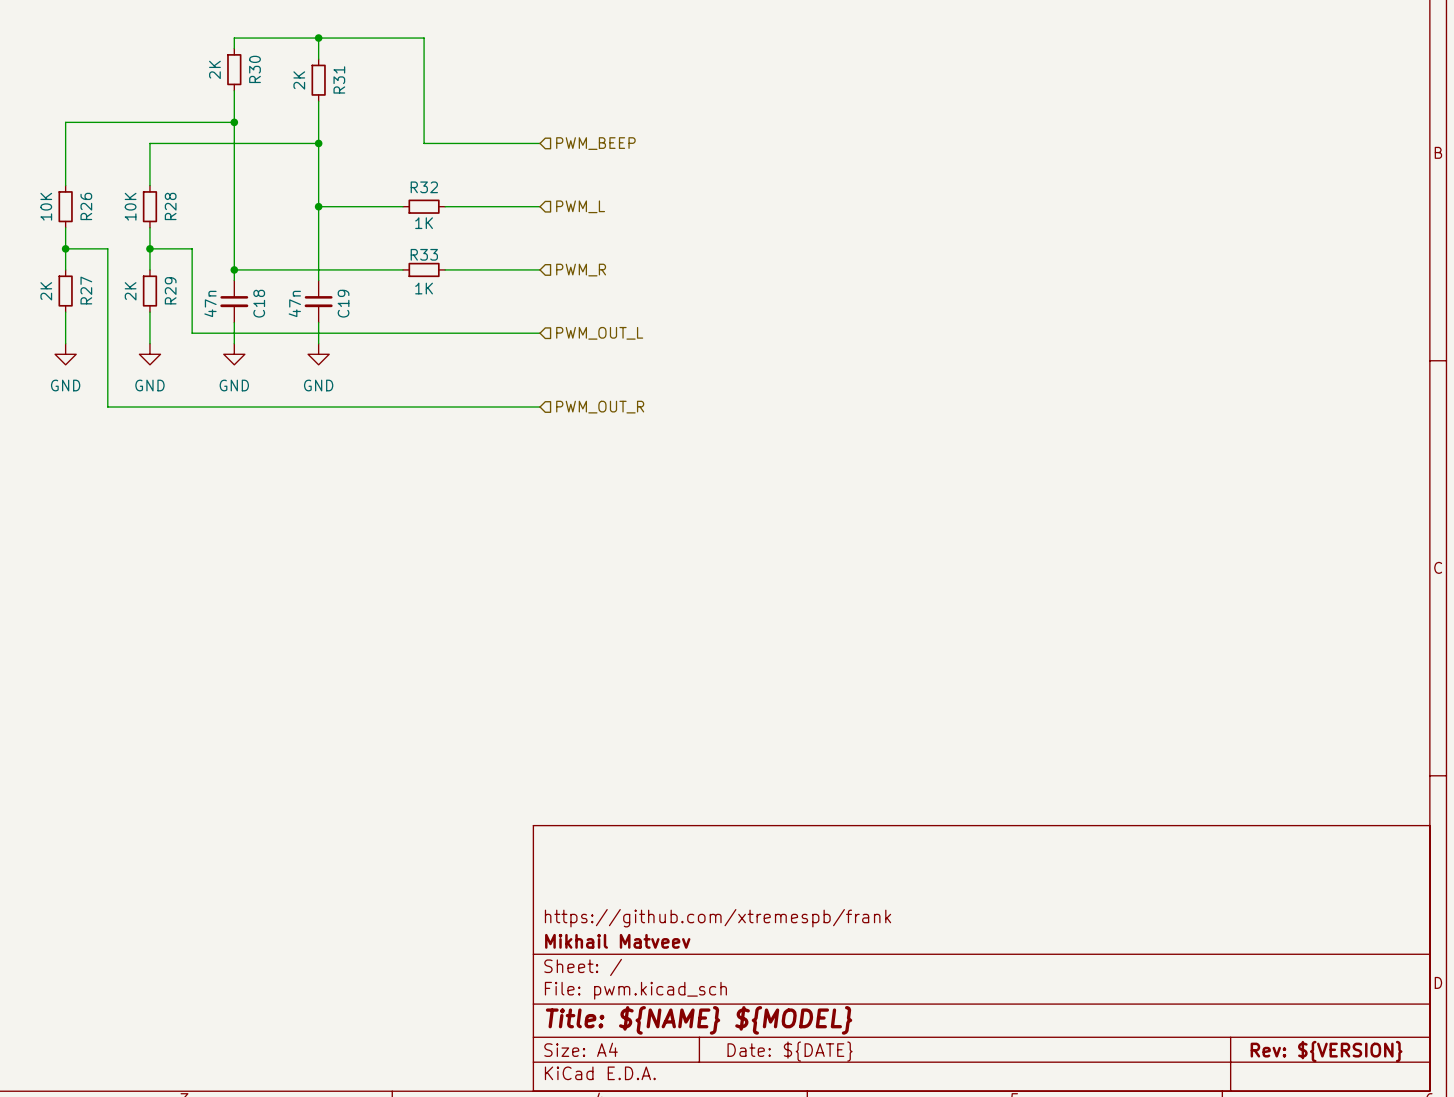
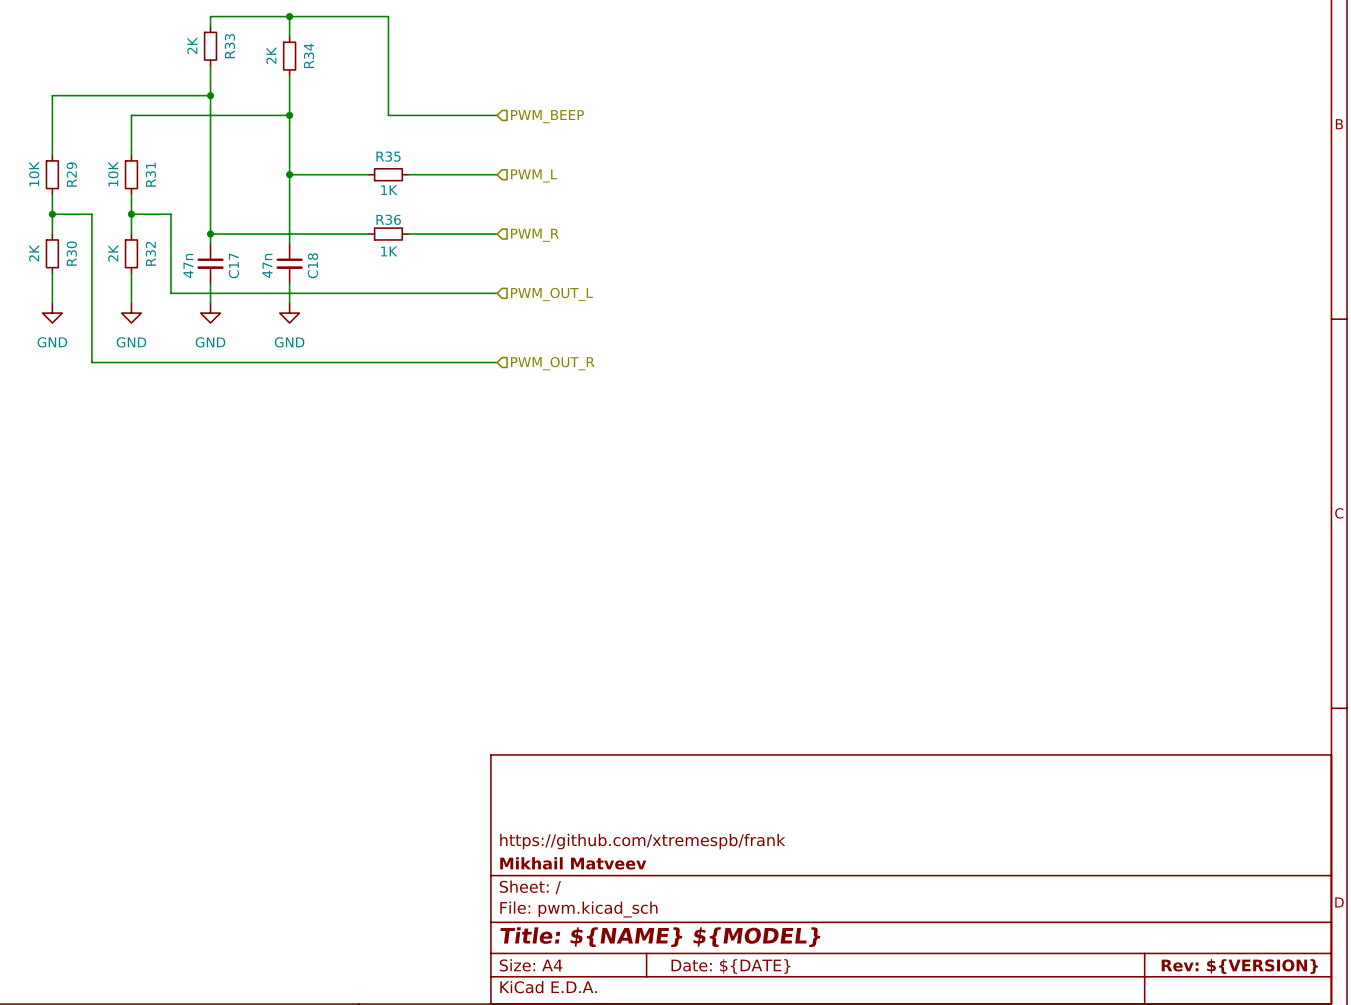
R30 name: R30 (255, 69) -> R33 (229, 46)
R31 name: R31 (339, 79) -> R34 (309, 55)
R32 name: R32 (424, 187) -> R35 (388, 156)
R26 name: R26 (86, 206) -> R29 (71, 174)
R28 name: R28 (170, 206) -> R31 (150, 174)
R33 name: R33 (424, 254) -> R36 (388, 219)
R27 name: R27 (86, 290) -> R30 (71, 253)
R29 name: R29 (170, 290) -> R32 (150, 253)
C18 name: C18 (259, 303) -> C17 (233, 265)
C19 name: C19 (343, 303) -> C18 (312, 265)

